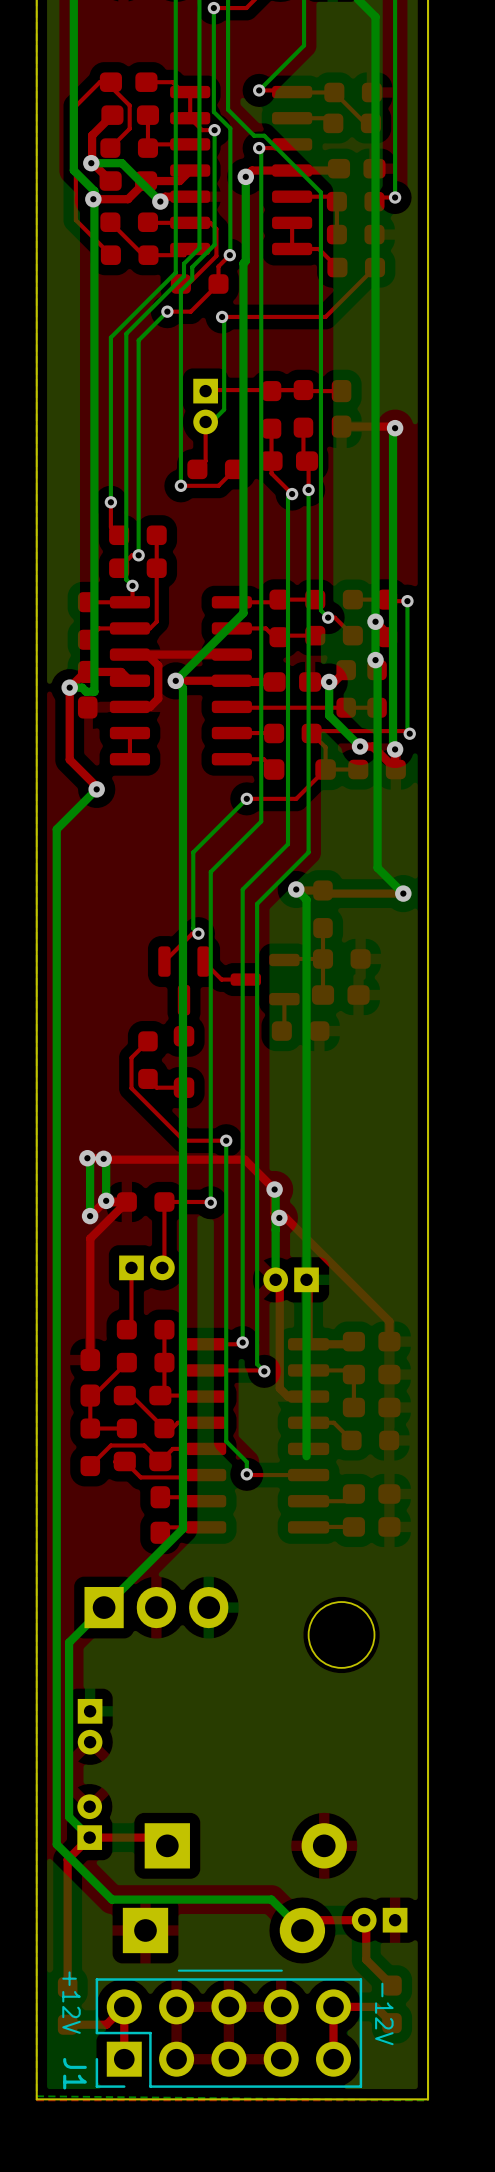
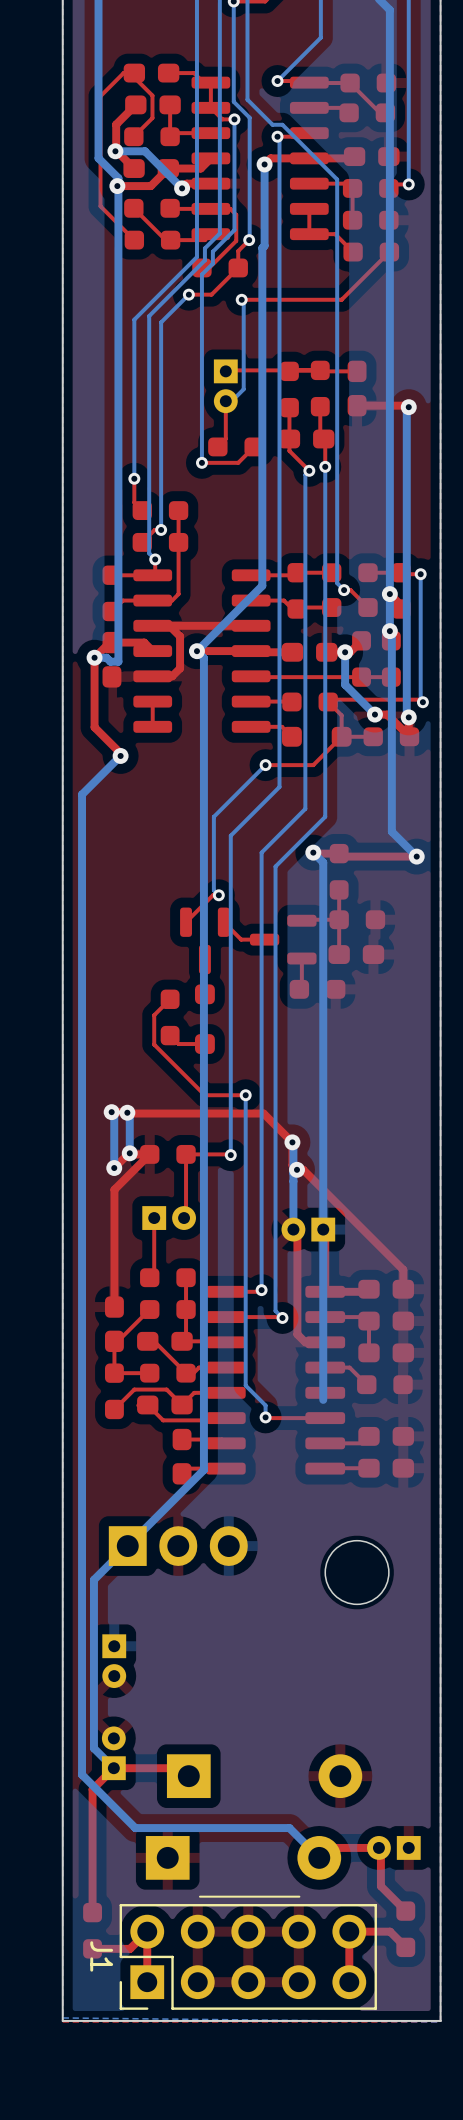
text: +12V (71, 2002) -> none
text: -12V (384, 2013) -> none
J1 name position: J1 (75, 2073) -> J1 (101, 1956)

